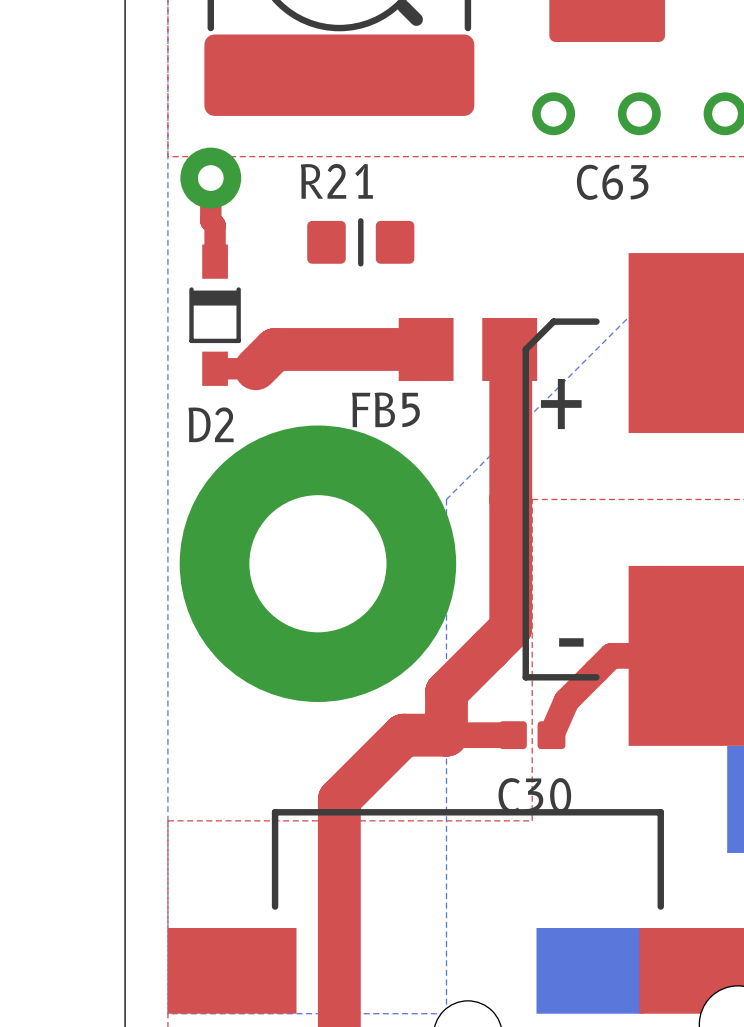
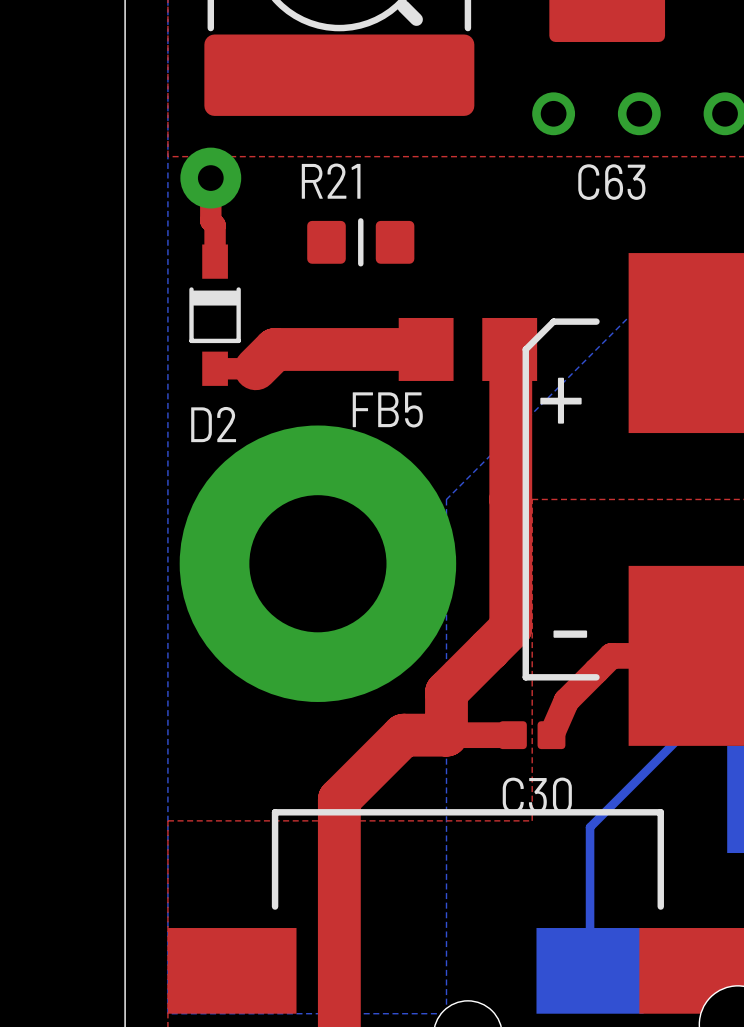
bottom track: none -> (703, 713) (590, 827) (590, 970)

